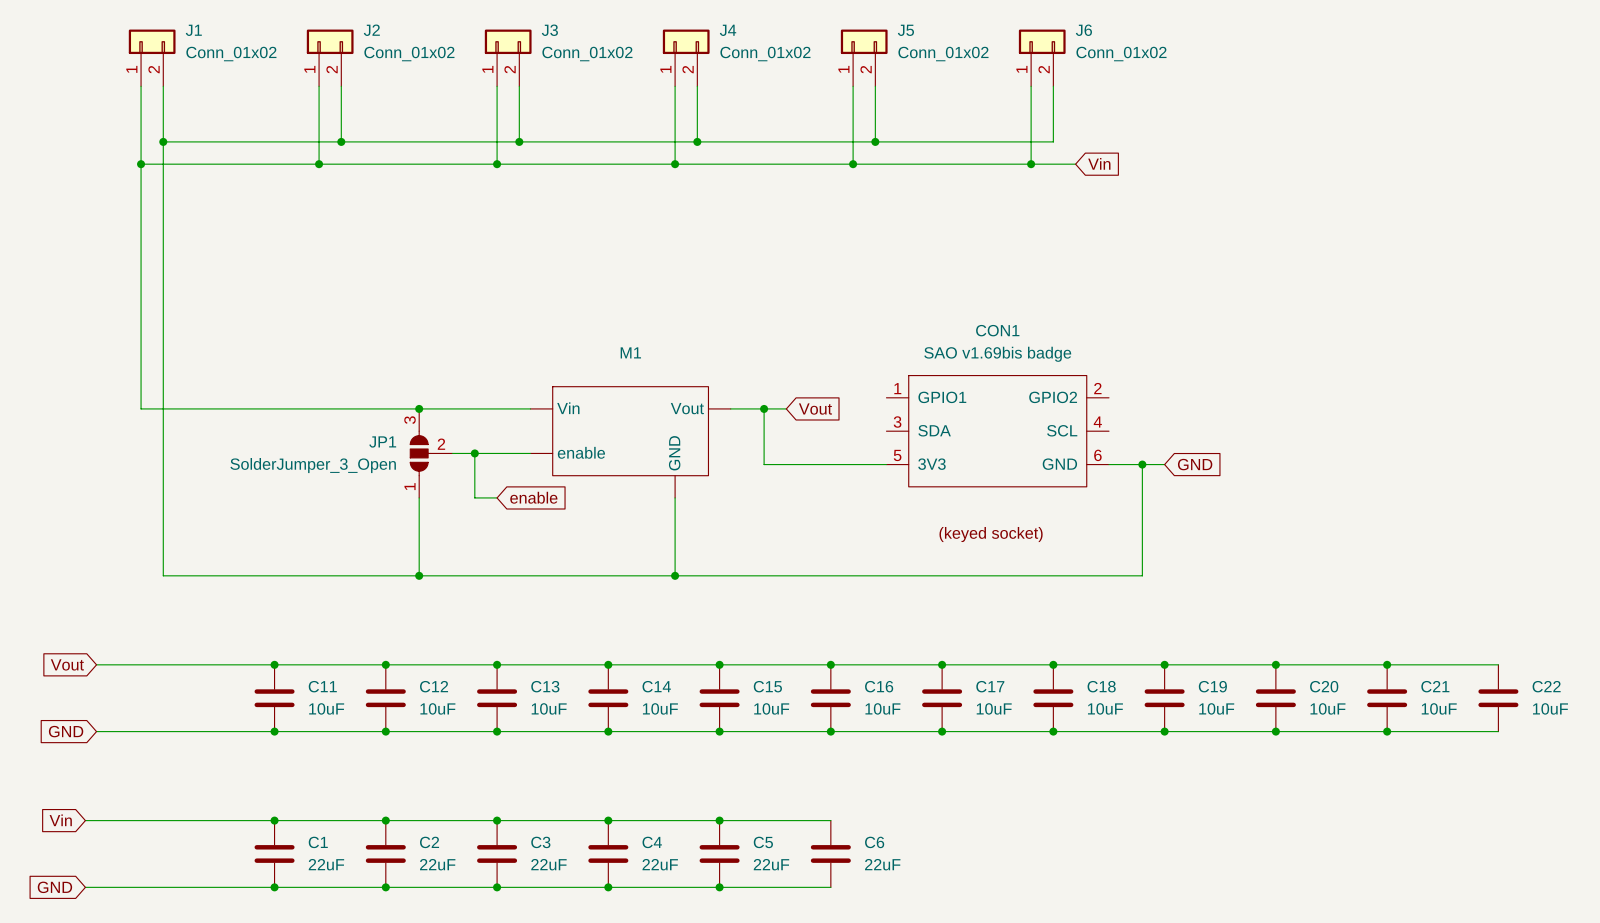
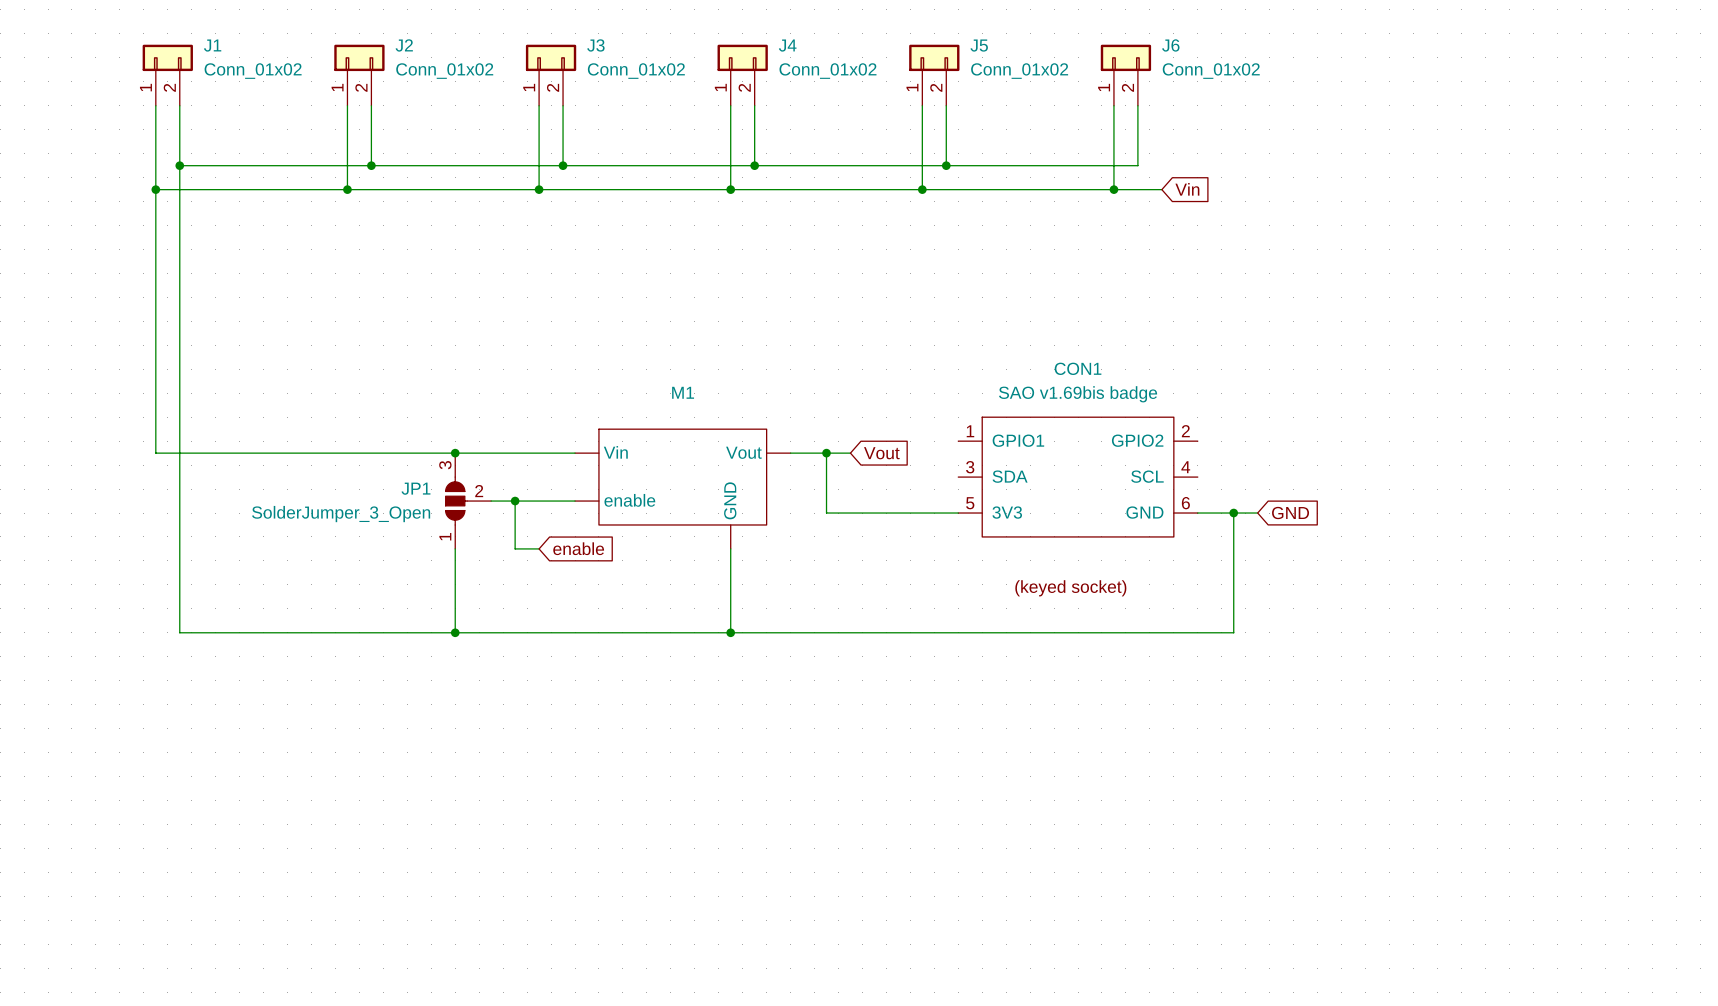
global label: Vout (67, 664) -> none
wire: (96, 664) (1498, 664) -> none
junction: (274, 664) -> none
junction: (385, 664) -> none
junction: (497, 664) -> none
junction: (608, 664) -> none
junction: (719, 664) -> none
junction: (830, 664) -> none
junction: (942, 664) -> none
junction: (1053, 664) -> none
junction: (1164, 664) -> none
junction: (1275, 664) -> none
junction: (1387, 664) -> none
C11: 10uF (274, 698) -> none
C12: 10uF (385, 698) -> none
C13: 10uF (497, 698) -> none
C14: 10uF (608, 698) -> none
C15: 10uF (719, 698) -> none
C16: 10uF (830, 698) -> none
C17: 10uF (942, 698) -> none
C18: 10uF (1053, 698) -> none
C19: 10uF (1164, 698) -> none
C20: 10uF (1275, 698) -> none
C21: 10uF (1387, 698) -> none
C22: 10uF (1498, 698) -> none
global label: GND (66, 731) -> none
wire: (96, 731) (1498, 731) -> none
junction: (274, 731) -> none
junction: (385, 731) -> none
junction: (497, 731) -> none
junction: (608, 731) -> none
junction: (719, 731) -> none
junction: (830, 731) -> none
junction: (942, 731) -> none
junction: (1053, 731) -> none
junction: (1164, 731) -> none
junction: (1275, 731) -> none
junction: (1387, 731) -> none
global label: Vin (60, 820) -> none
wire: (85, 820) (830, 820) -> none
junction: (274, 820) -> none
junction: (385, 820) -> none
junction: (497, 820) -> none
junction: (608, 820) -> none
junction: (719, 820) -> none
C1: 22uF (274, 853) -> none
C2: 22uF (385, 853) -> none
C3: 22uF (497, 853) -> none
C4: 22uF (608, 853) -> none
C5: 22uF (719, 853) -> none
C6: 22uF (830, 853) -> none
global label: GND (54, 887) -> none
wire: (85, 887) (830, 887) -> none
junction: (274, 887) -> none
junction: (385, 887) -> none
junction: (497, 887) -> none
junction: (608, 887) -> none
junction: (719, 887) -> none

